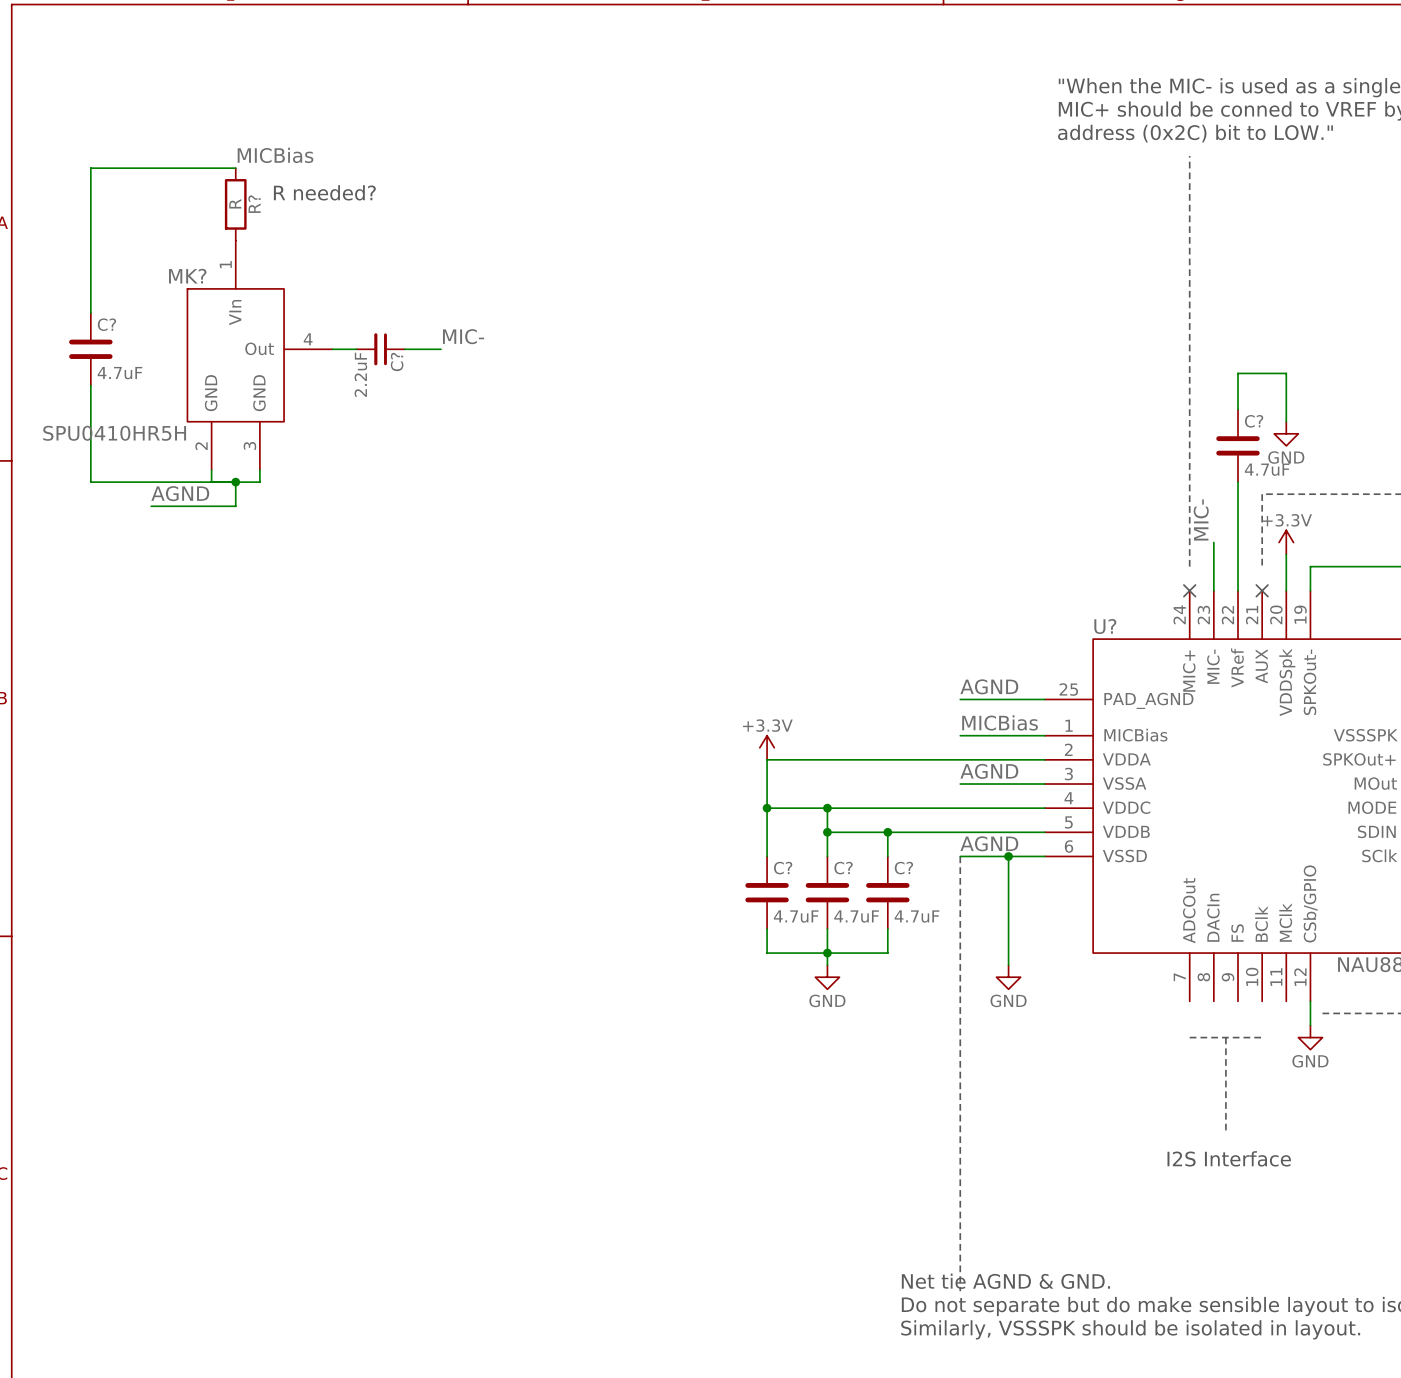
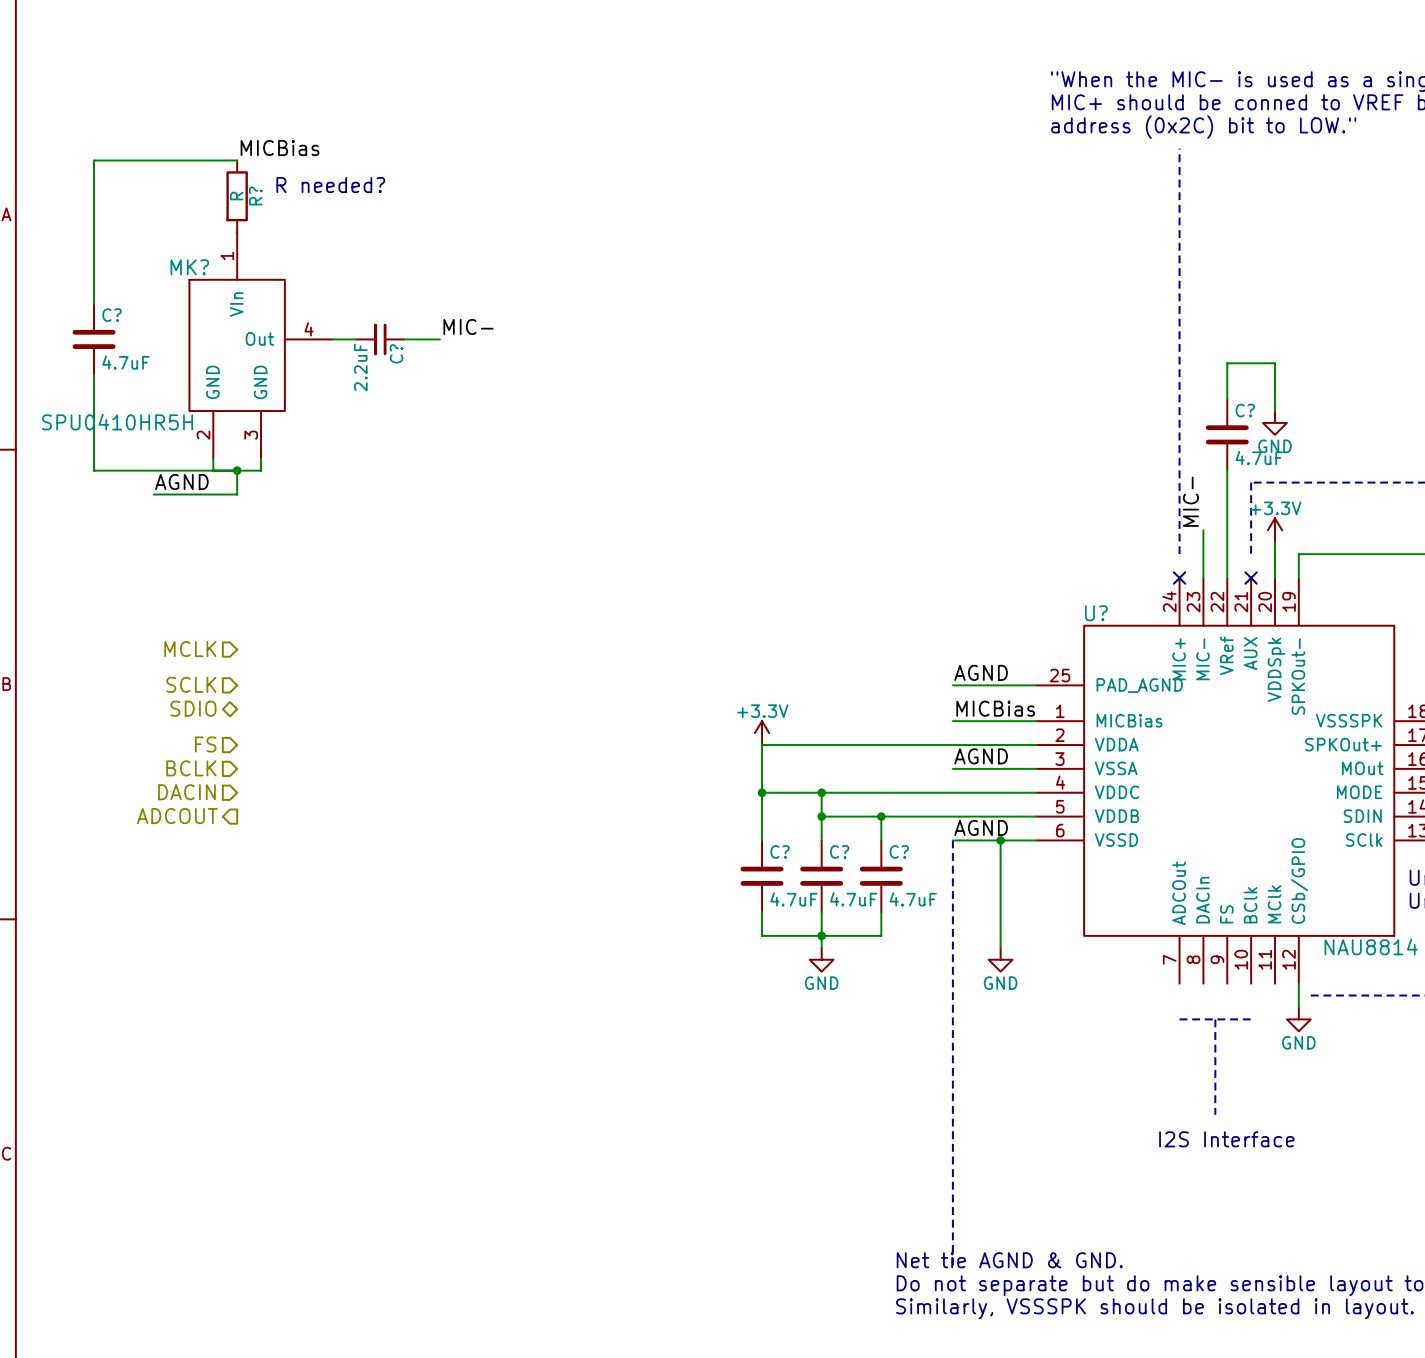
hierarchical label: none -> MCLK (190, 649)
hierarchical label: none -> SCLK (191, 684)
hierarchical label: none -> SDIO (193, 708)
hierarchical label: none -> FS (205, 744)
hierarchical label: none -> BCLK (191, 768)
hierarchical label: none -> DACIN (186, 792)
hierarchical label: none -> ADCOUT (177, 816)

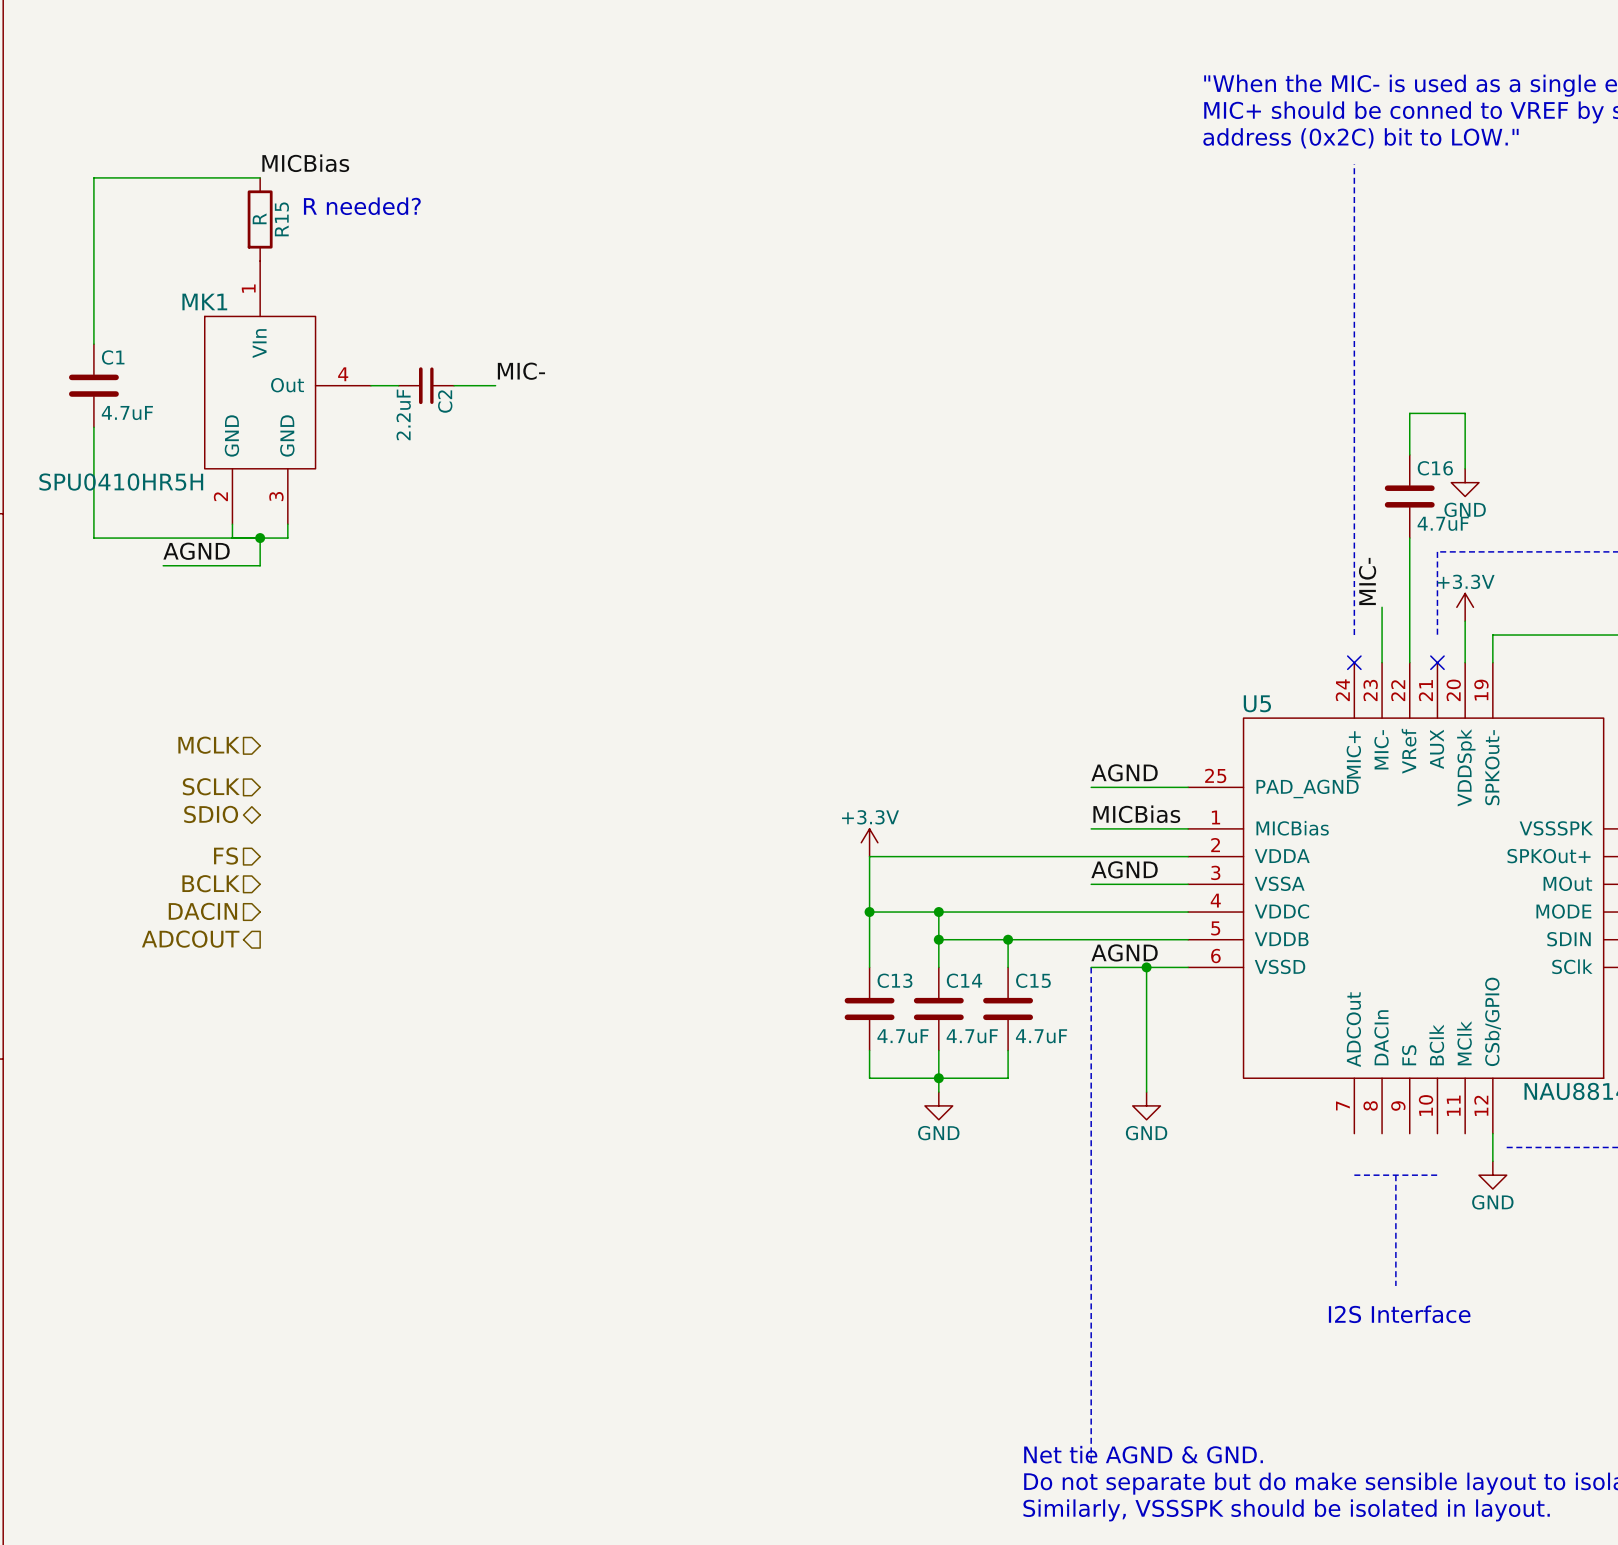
R? name: R? (255, 196) -> R15 (281, 219)
MK? name: MK? (189, 267) -> MK1 (204, 301)
C? name: C? (112, 315) -> C1 (113, 357)
C? name: C? (396, 353) -> C2 (445, 401)
C? name: C? (1245, 410) -> C16 (1435, 468)
U? name: U? (1096, 613) -> U5 (1257, 703)
C? name: C? (780, 851) -> C13 (894, 980)
C? name: C? (839, 851) -> C14 (964, 980)
C? name: C? (899, 851) -> C15 (1033, 980)

